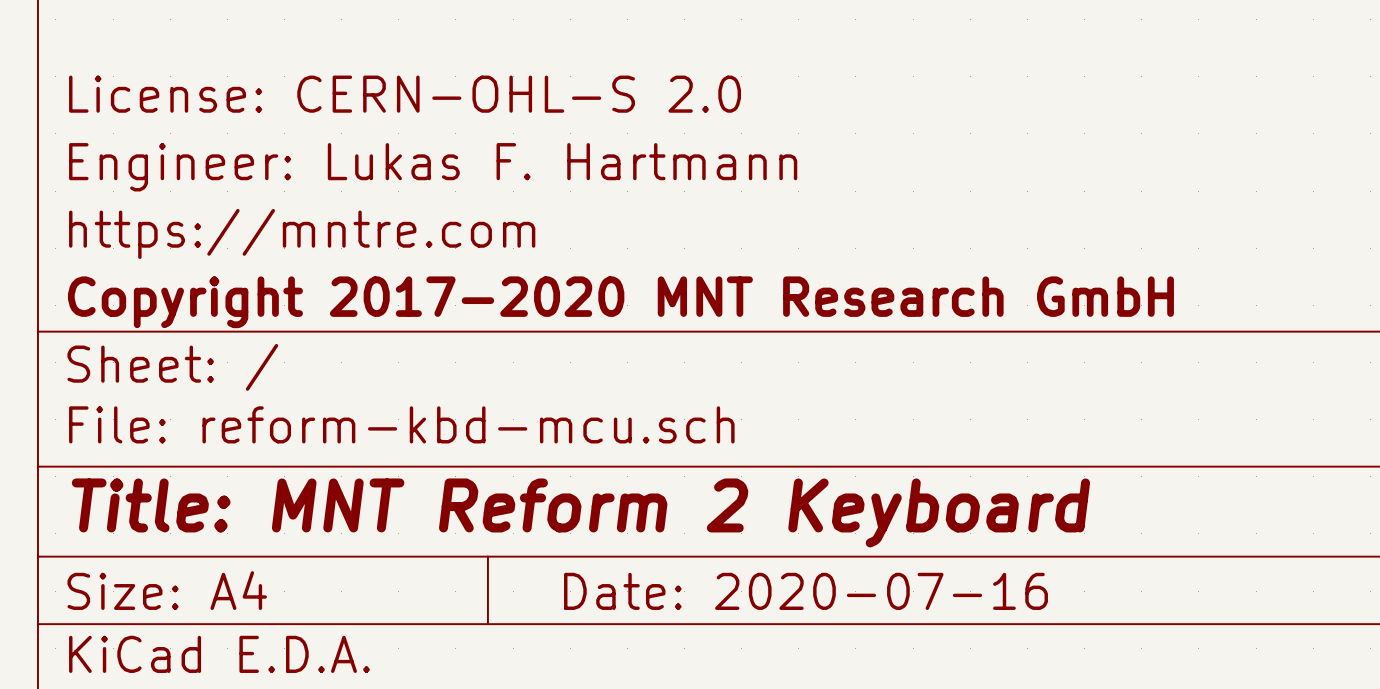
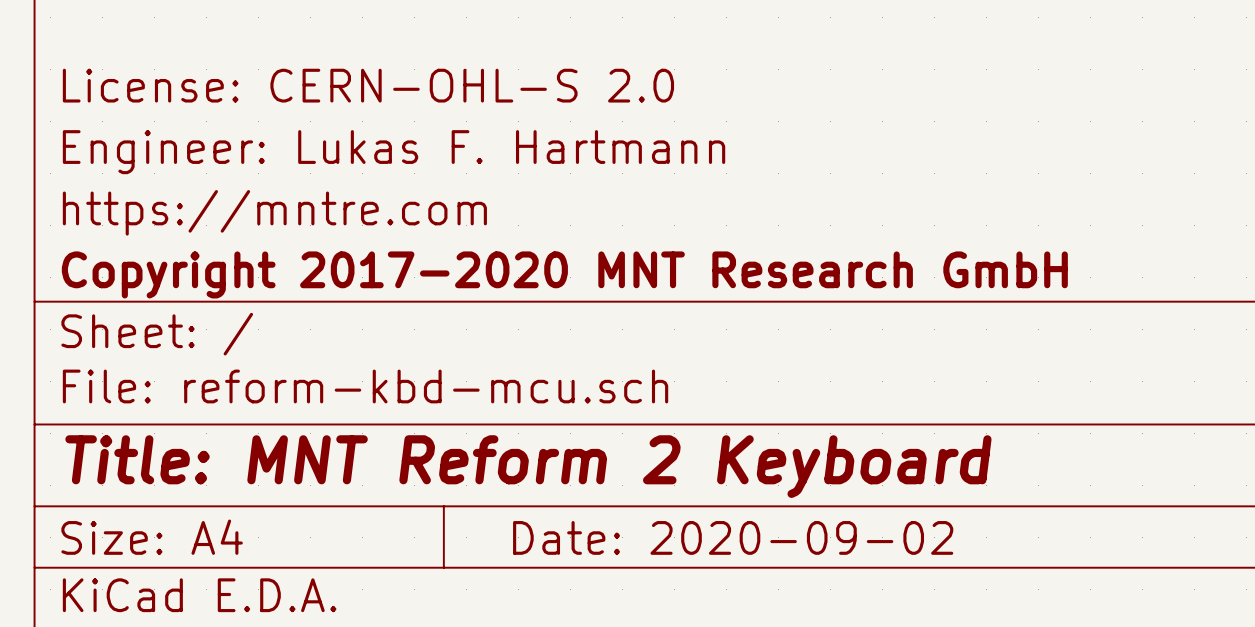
title block: Date: 2020-07-16 (806, 591) -> Date: 2020-09-02 (733, 537)

